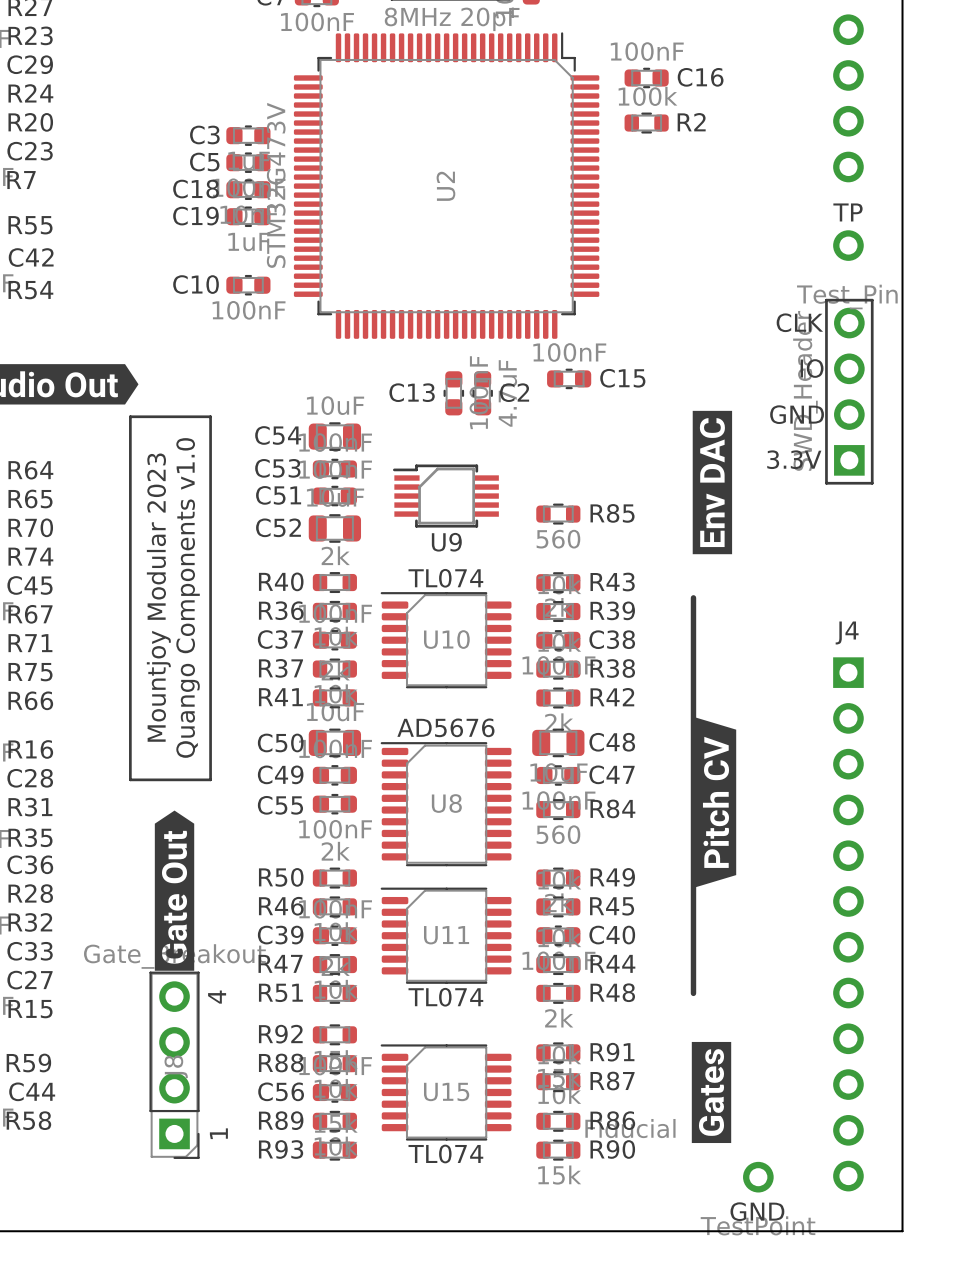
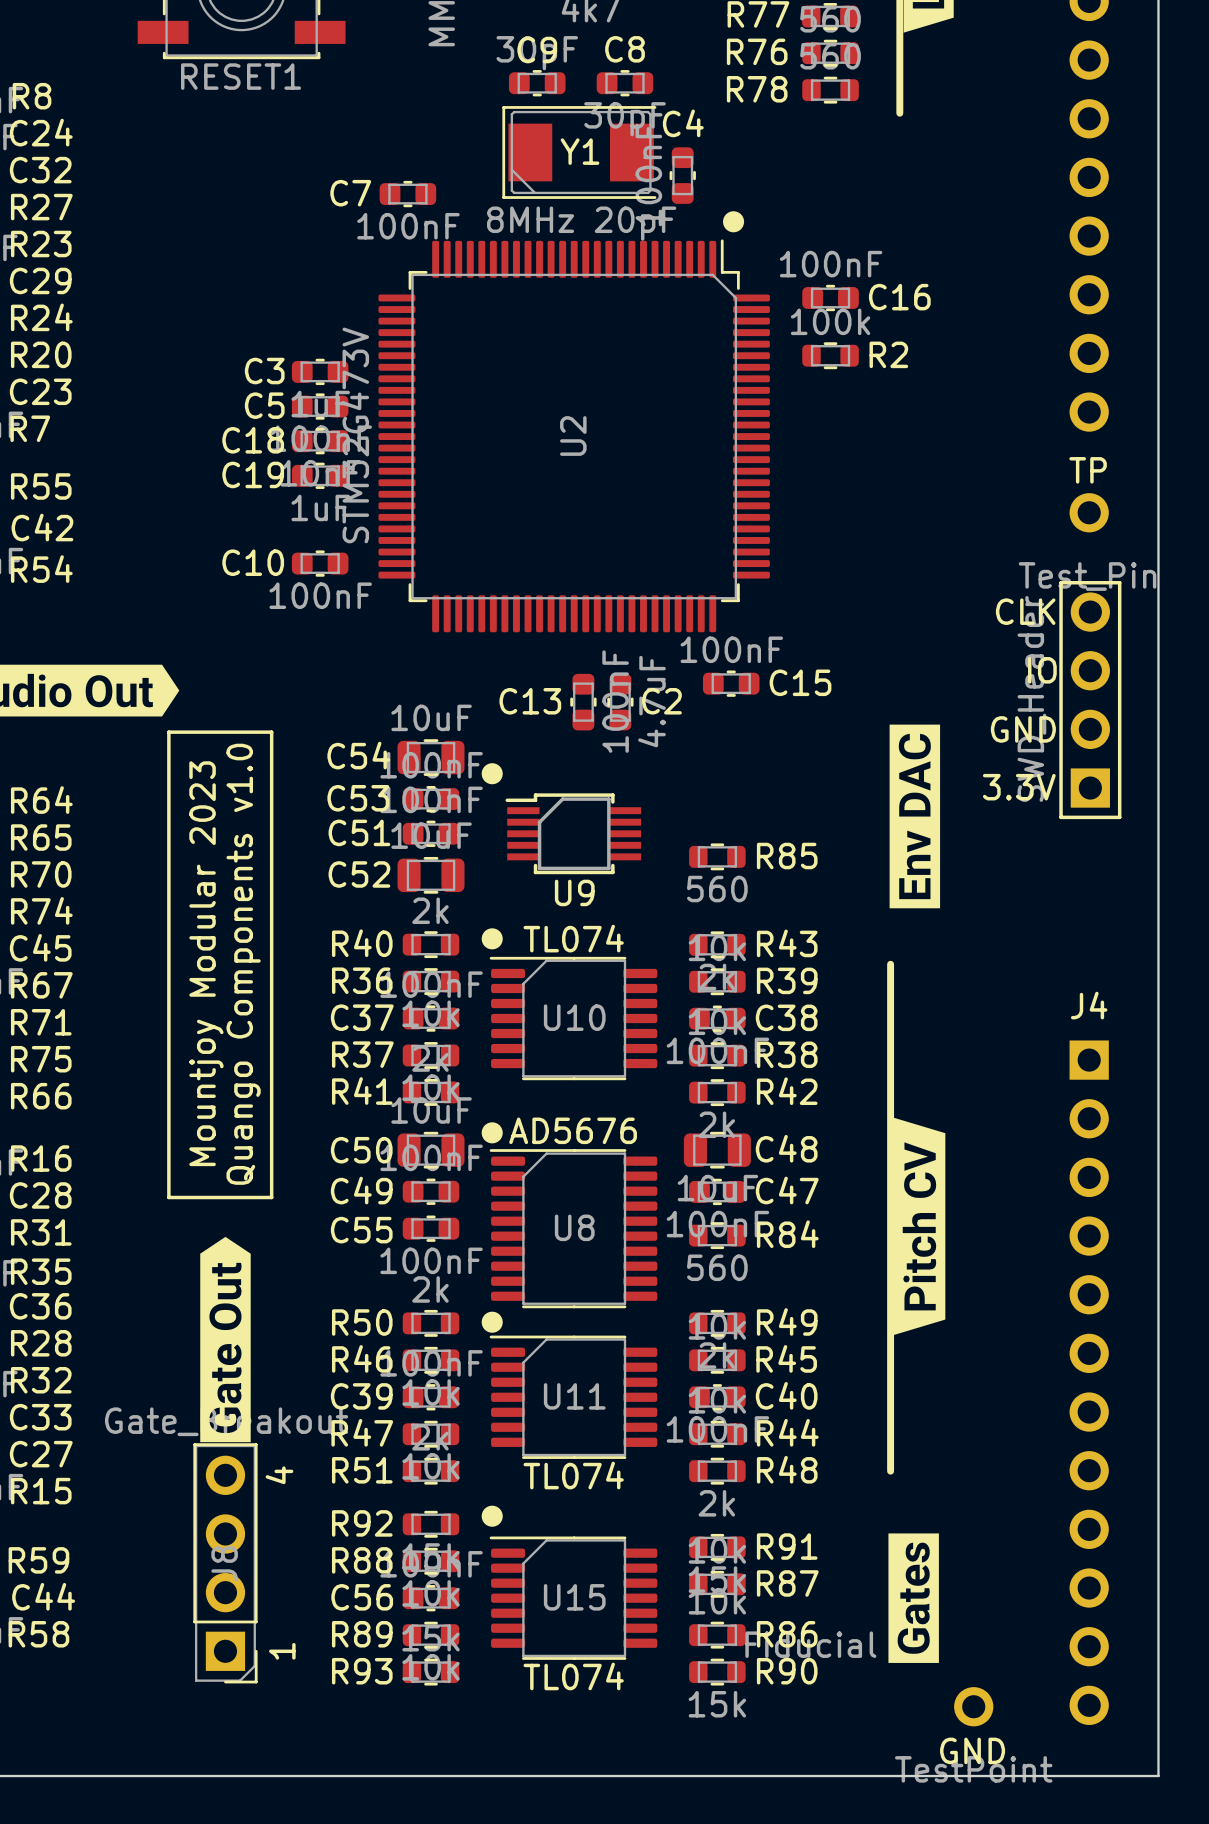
drawing: none -> [723, 211, 745, 233]
drawing: none -> [481, 763, 503, 785]
drawing: none -> [481, 928, 503, 950]
drawing: none -> [481, 1122, 503, 1144]
drawing: none -> [481, 1311, 503, 1333]
drawing: none -> [481, 1505, 503, 1527]

